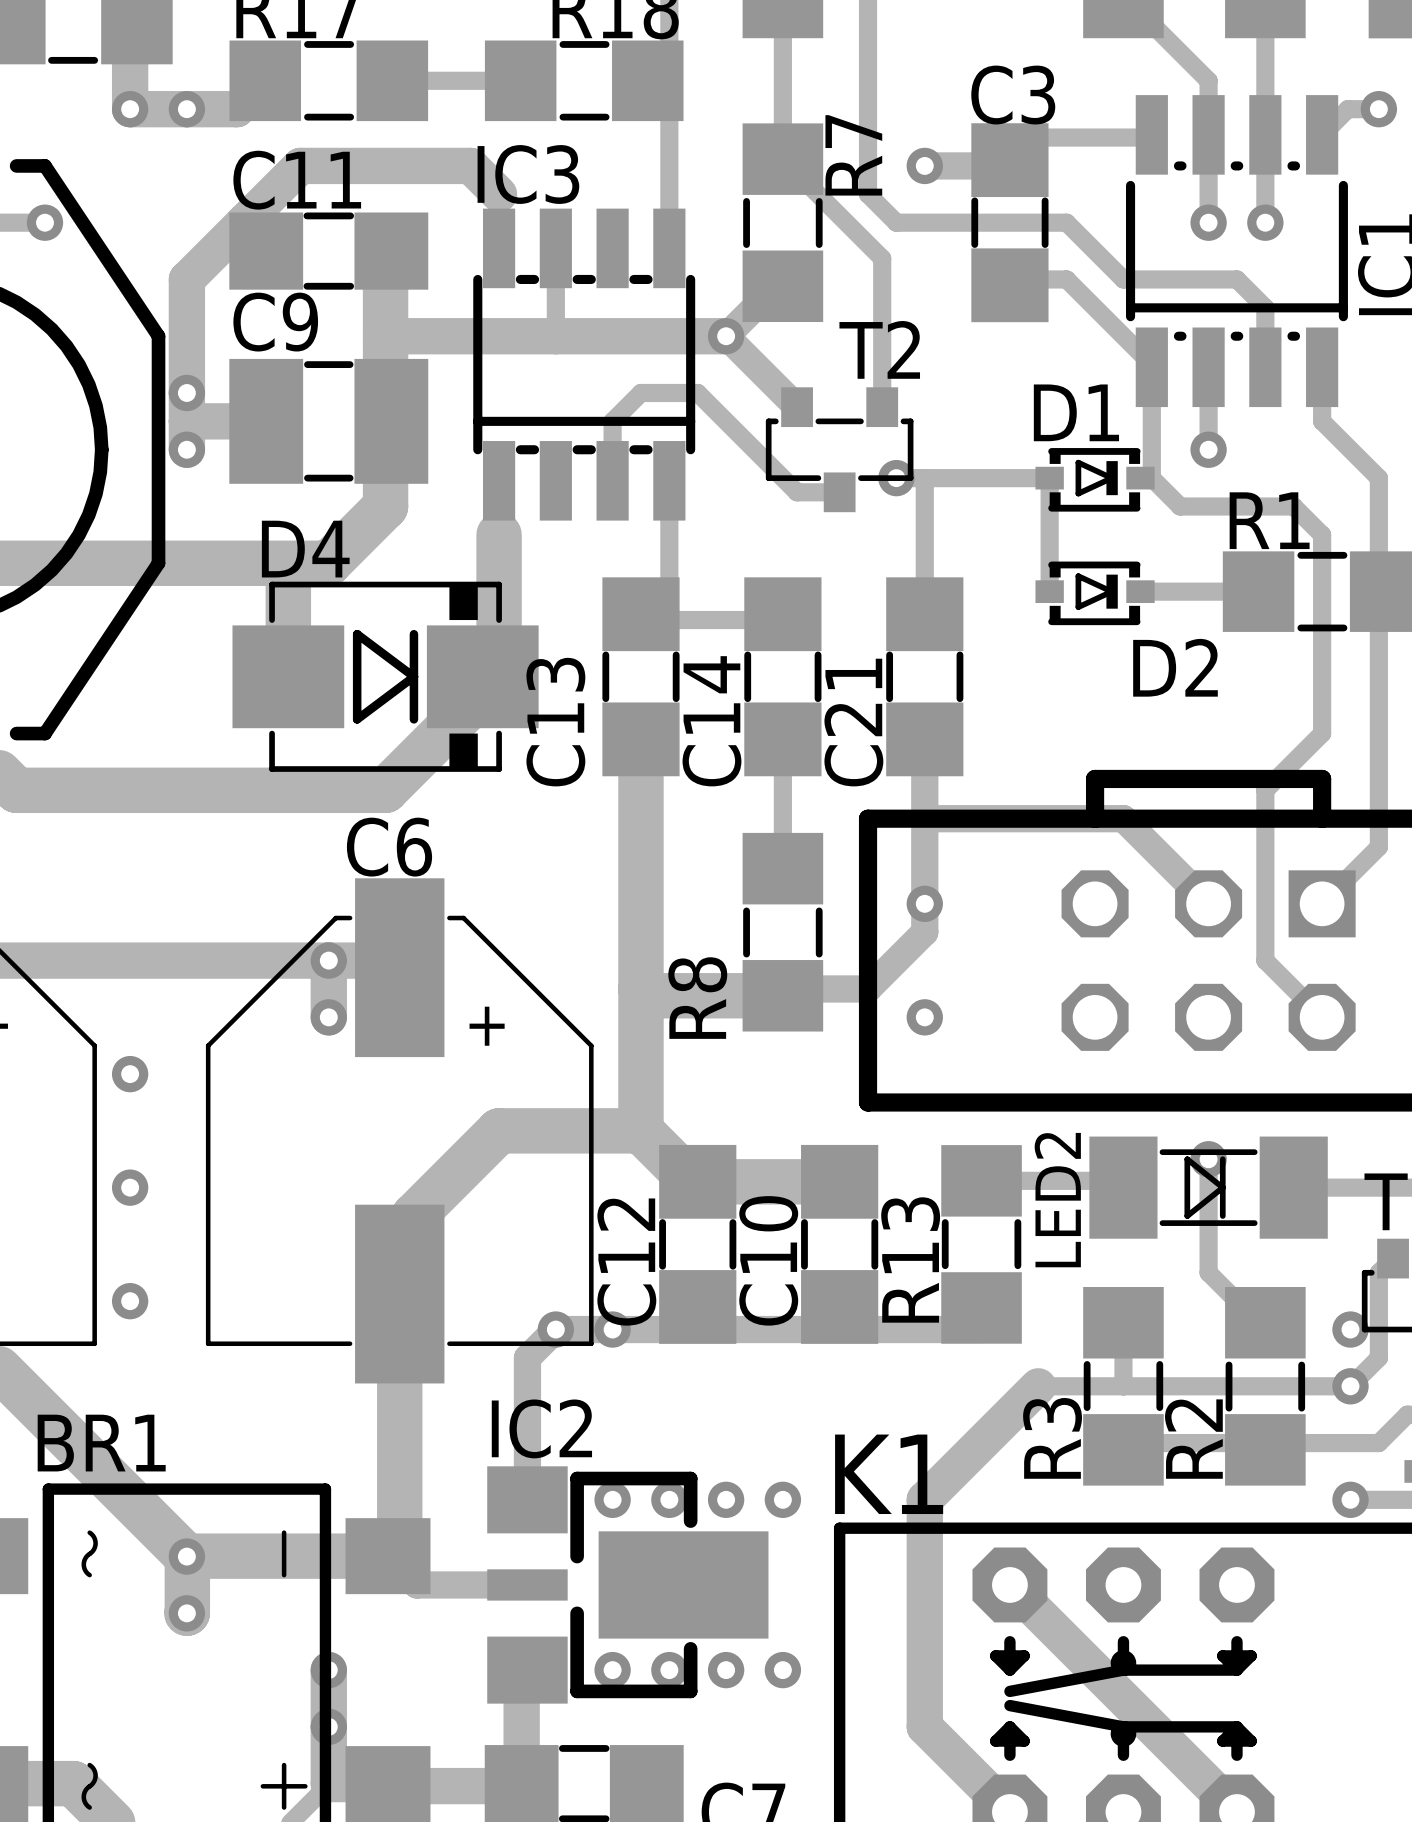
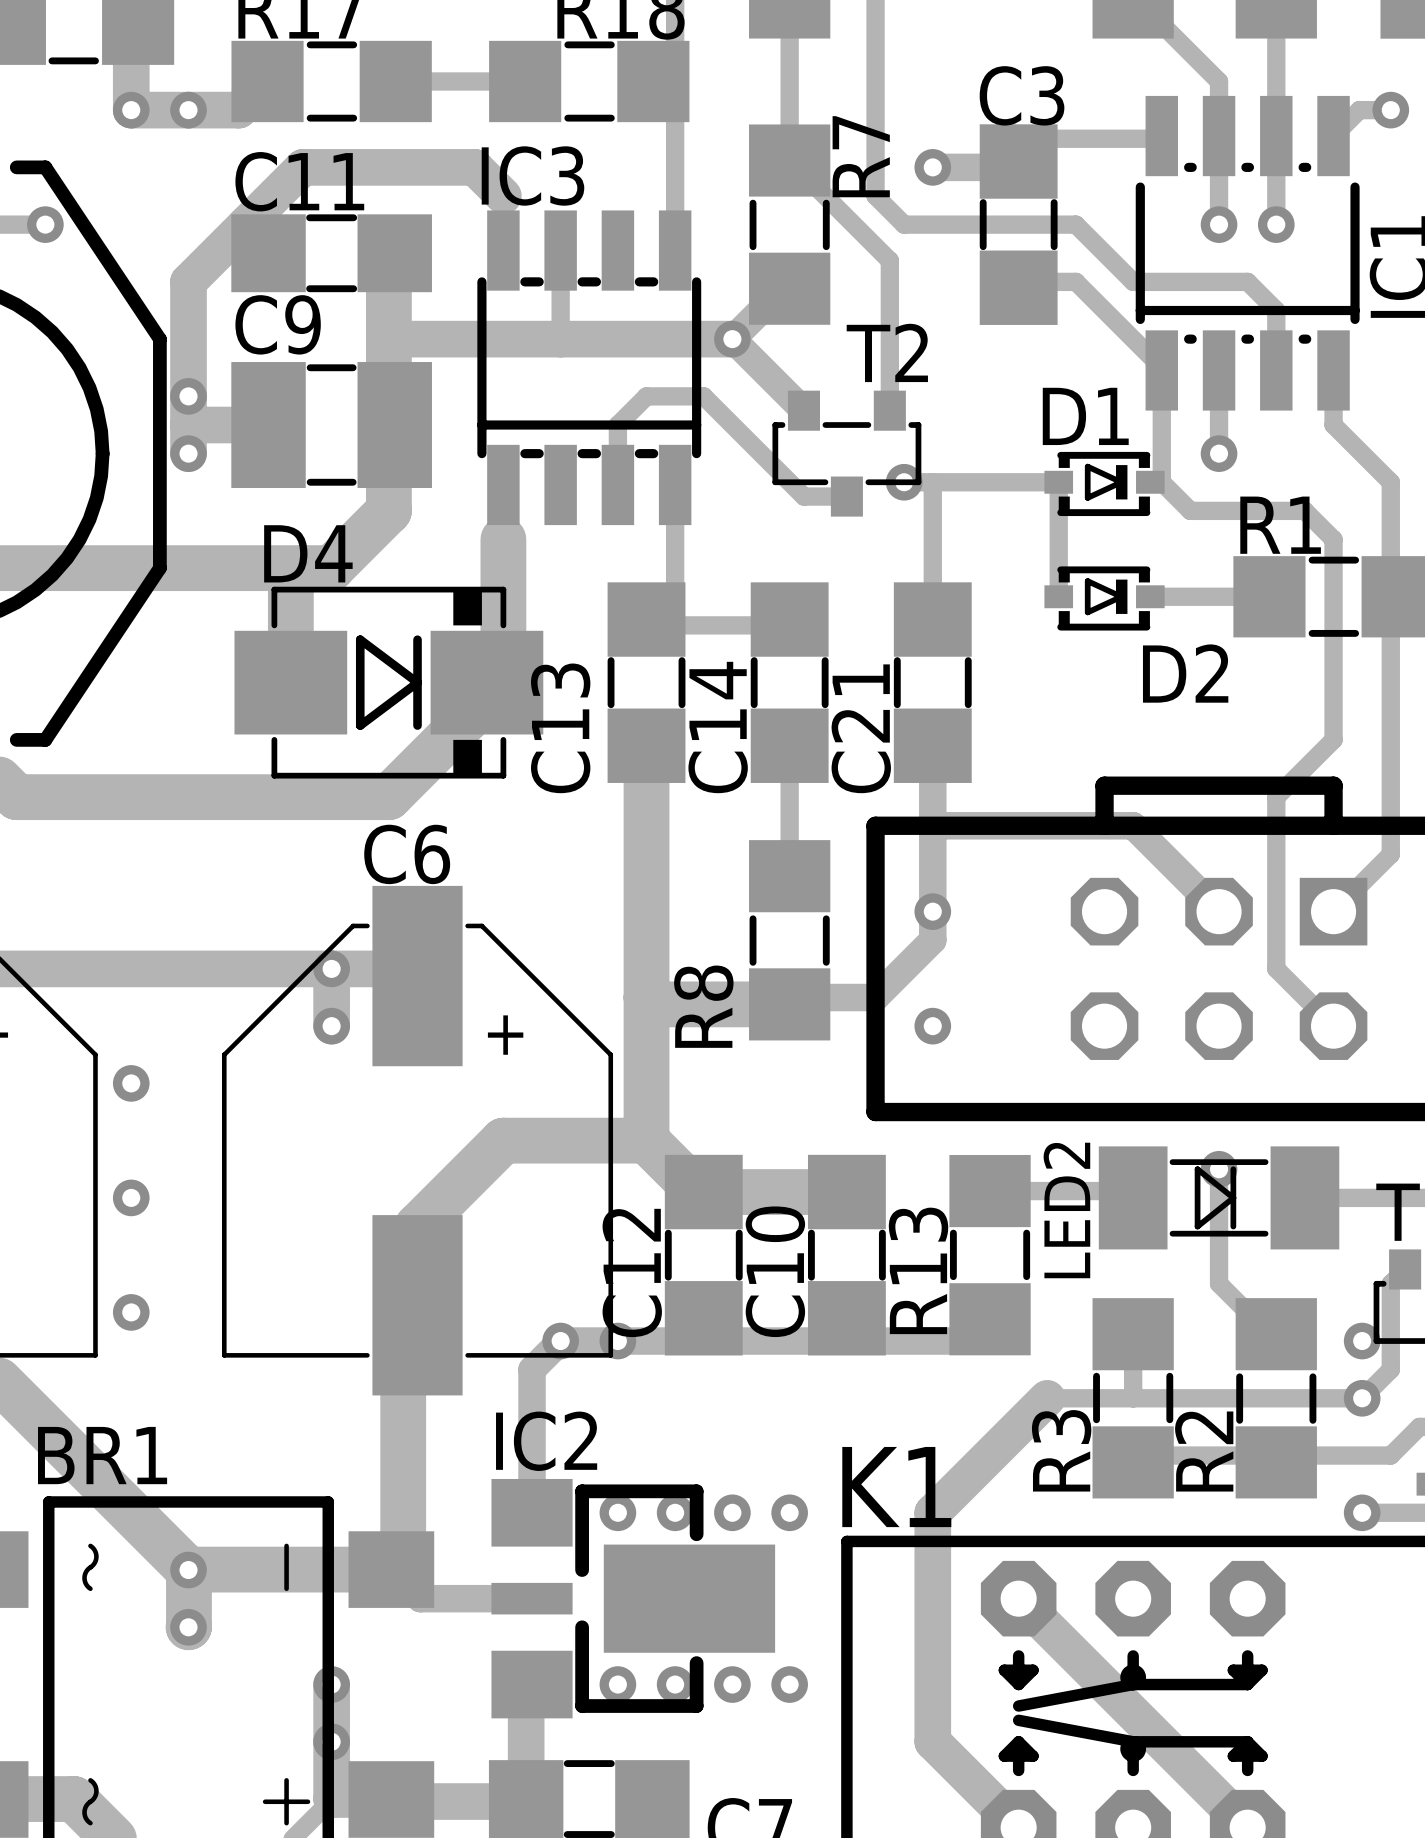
C6 position: (399, 1130) -> (417, 1140)

